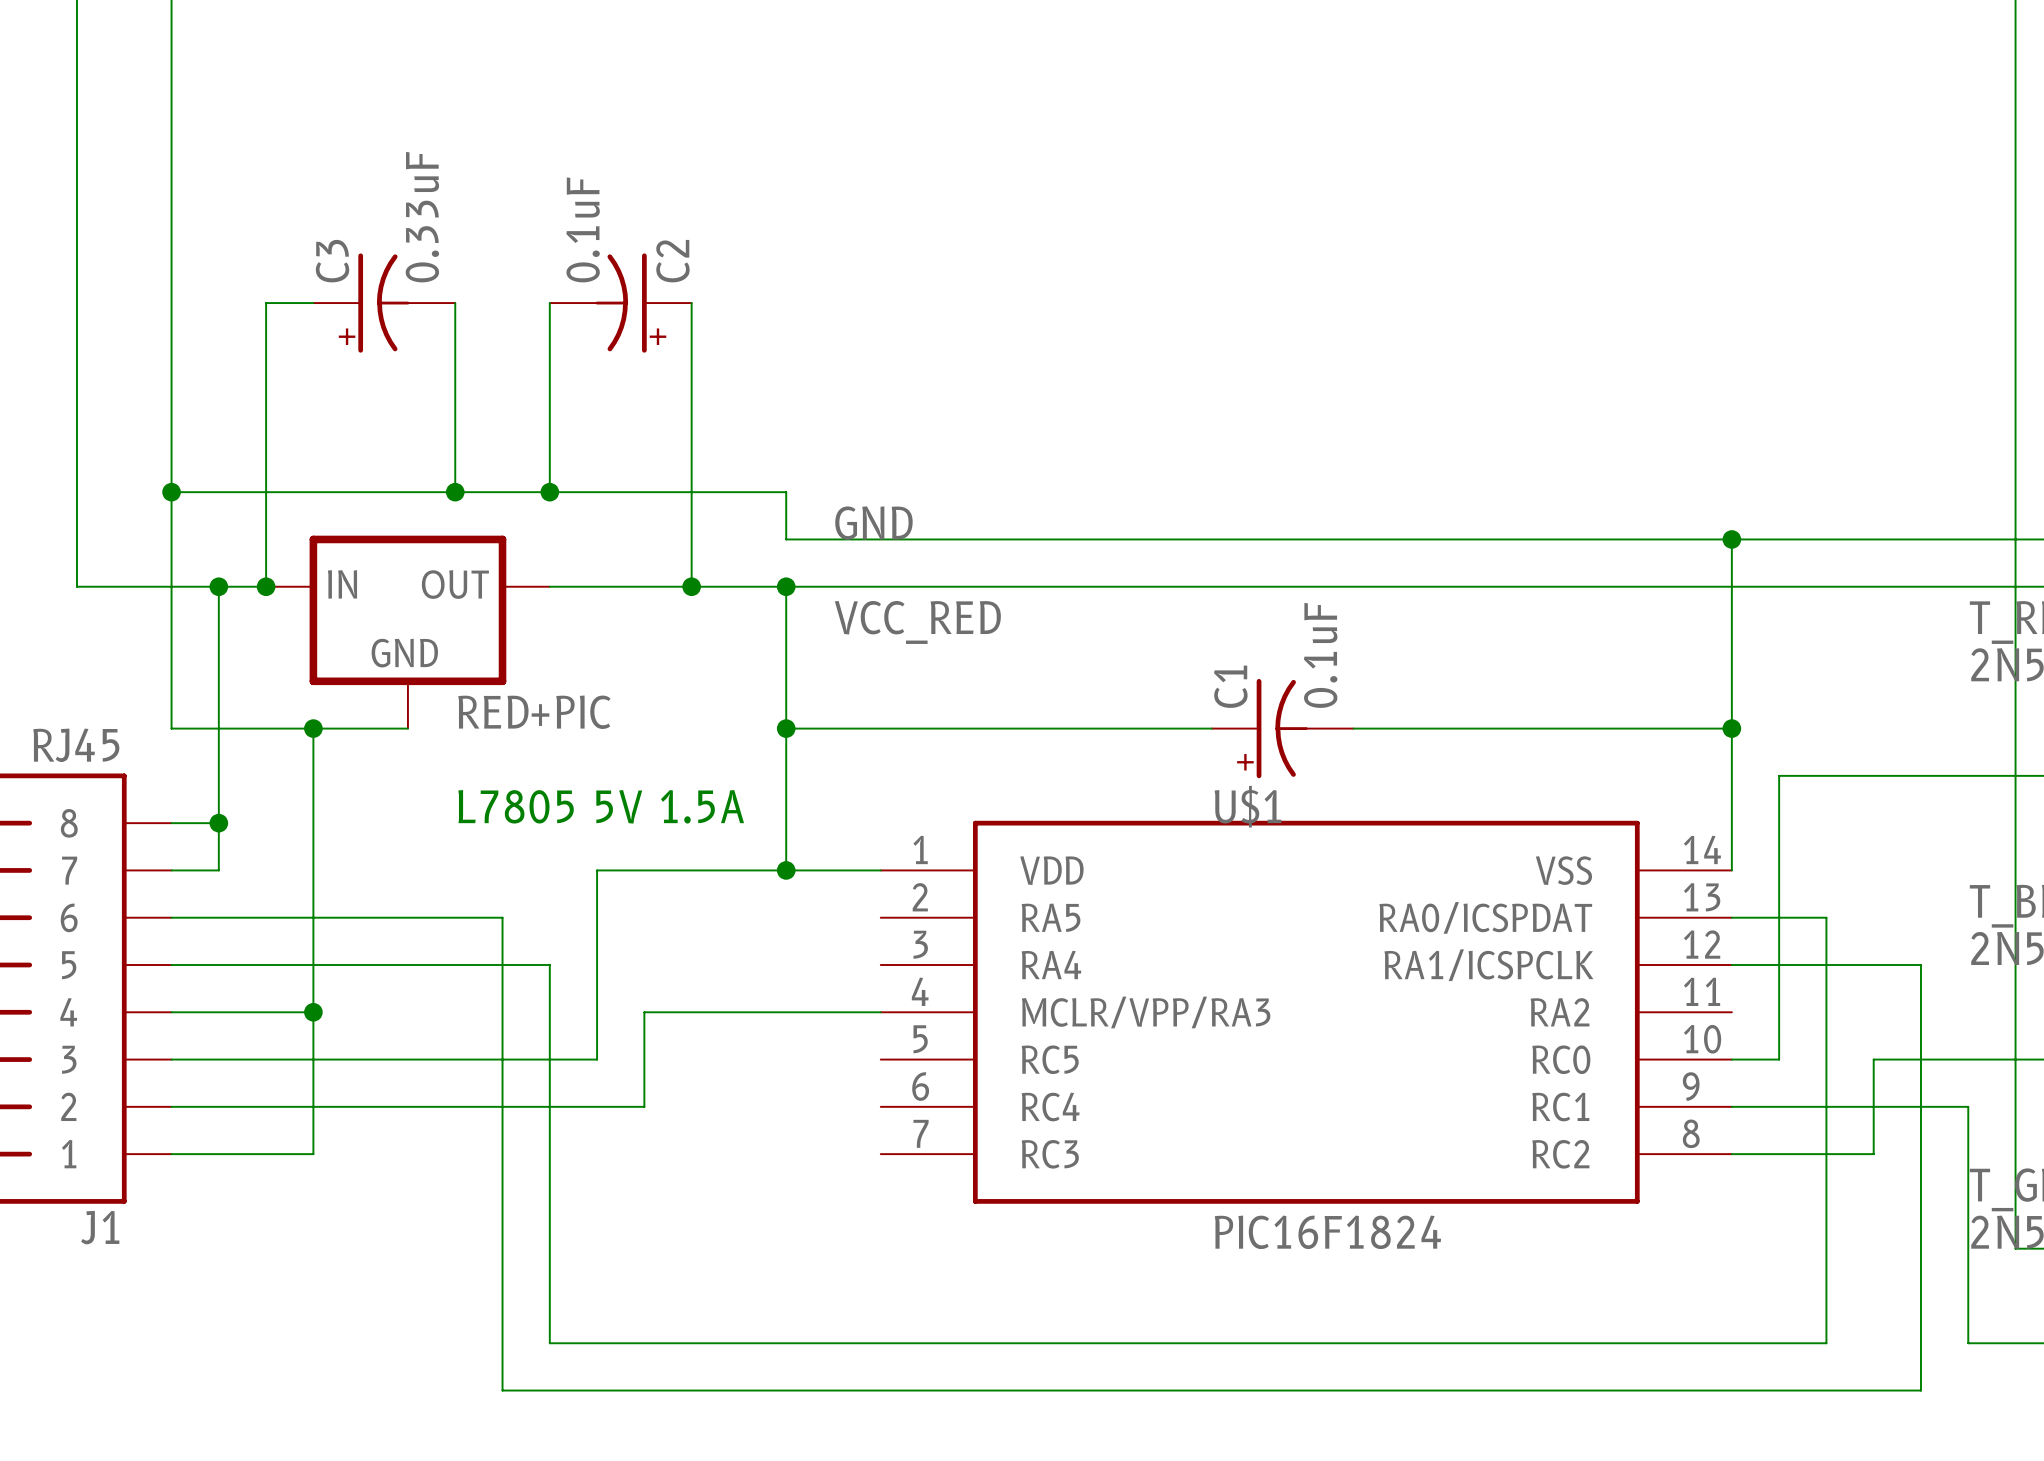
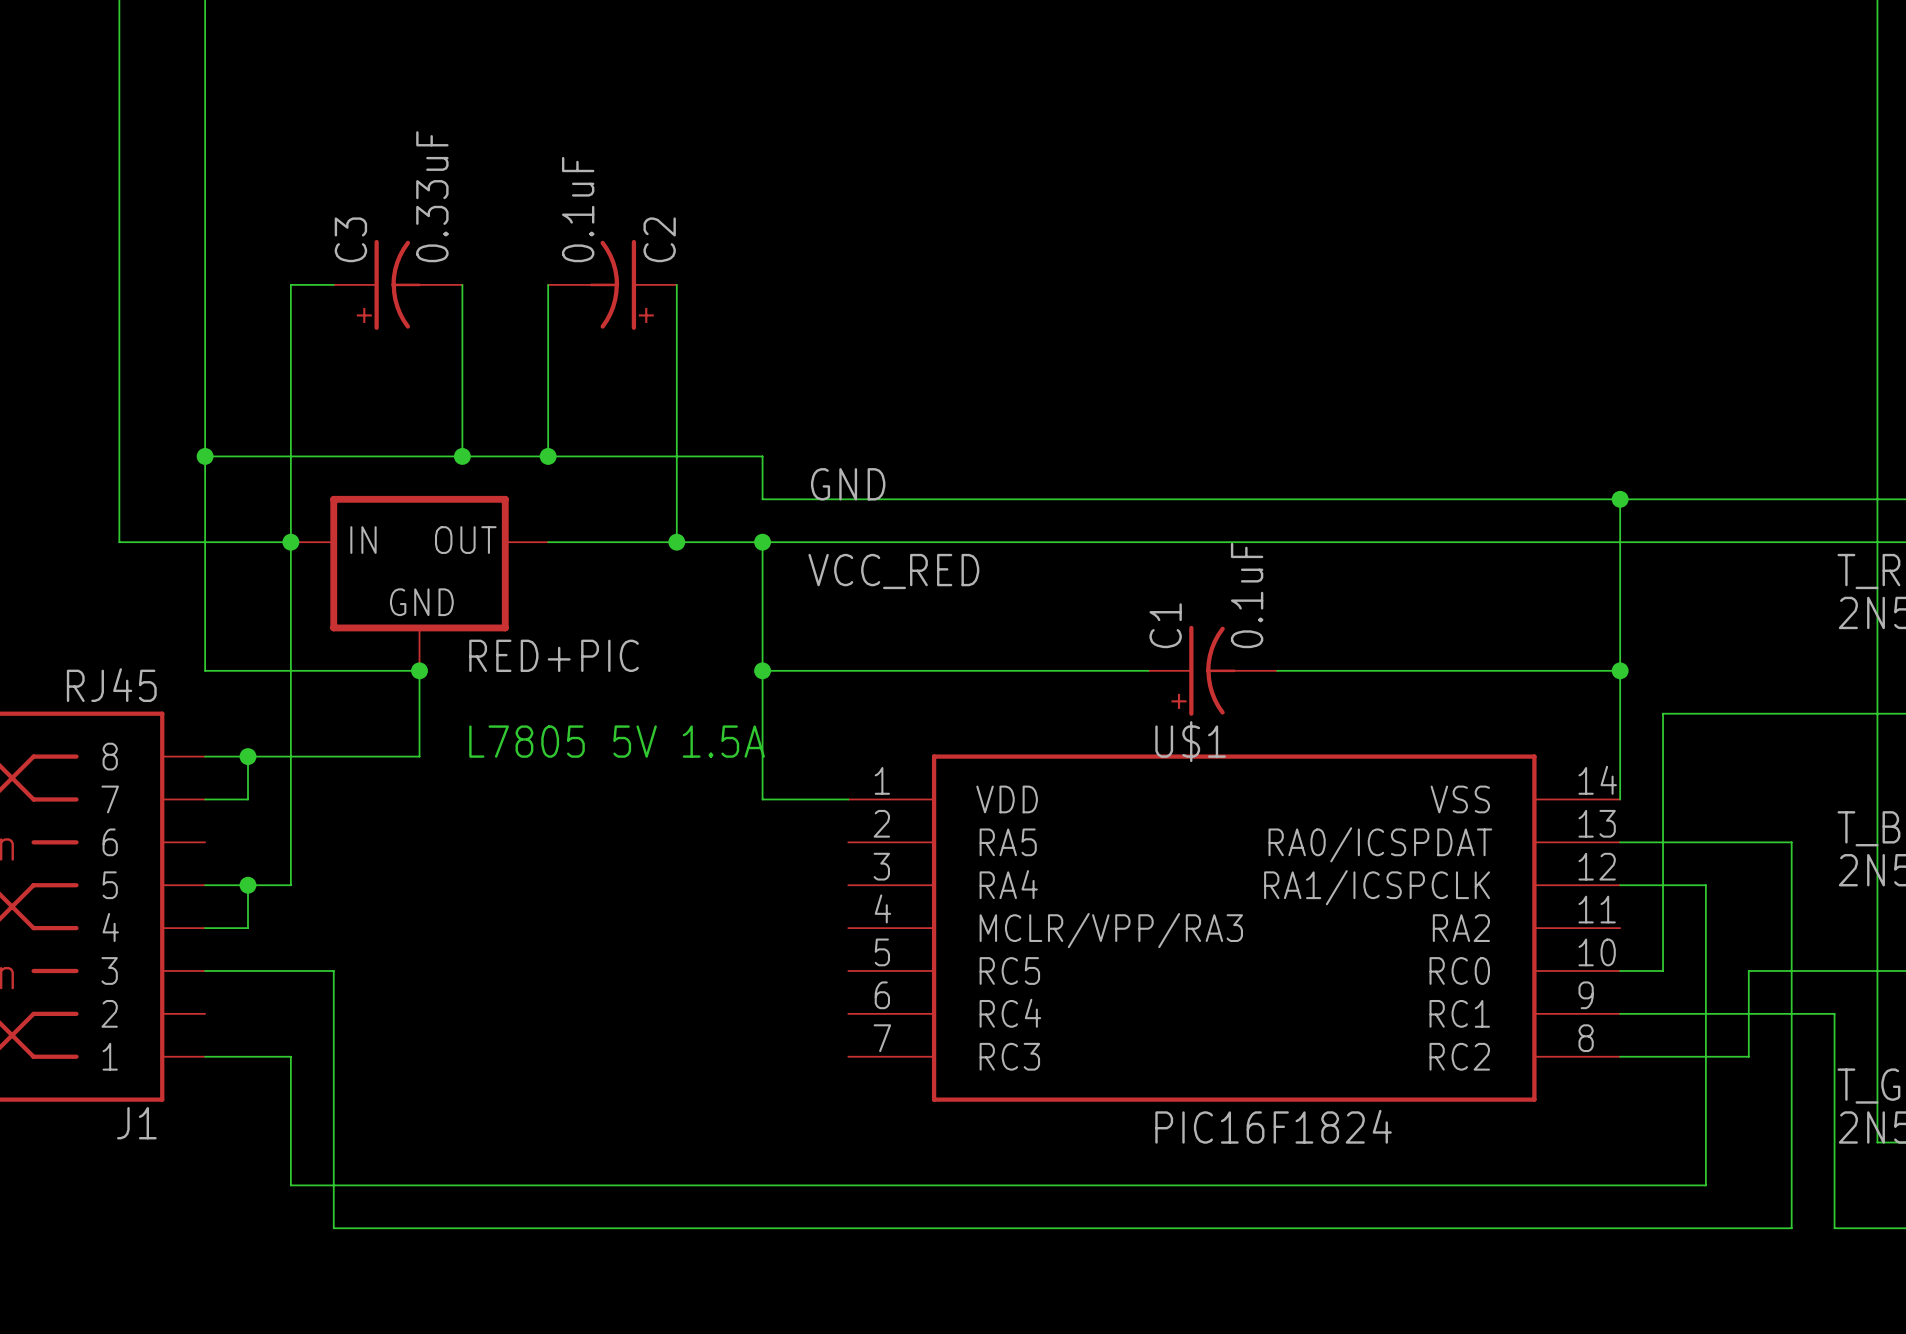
wire: (218, 586) (218, 823) -> (419, 670) (419, 756) (248, 756)
junction: (218, 586) -> none
wire: none -> (290, 542) (290, 885)
wire: (313, 728) (313, 1059) (597, 1059) (597, 870) (786, 870) -> none
junction position: (313, 728) -> (419, 670)
junction: (786, 870) -> none
wire: (171, 917) (502, 917) (502, 1390) (1920, 1390) (1920, 1343) -> none
wire: (1826, 917) (1826, 965) (1920, 965) -> (1705, 842) (1791, 842) (1791, 885)
wire: (266, 965) (549, 965) (549, 1343) -> (333, 1056) (333, 1228) (548, 1228)
wire: (218, 1012) (313, 1012) -> (248, 928) (248, 885)
junction position: (313, 1012) -> (248, 885)
wire: (880, 1012) (644, 1012) (644, 1106) (171, 1106) -> none
wire: (266, 1154) (313, 1154) -> (290, 1056) (290, 1185) (1705, 1185)
wire: (1826, 1295) (1826, 1343) -> (1791, 1228) (1705, 1228)

